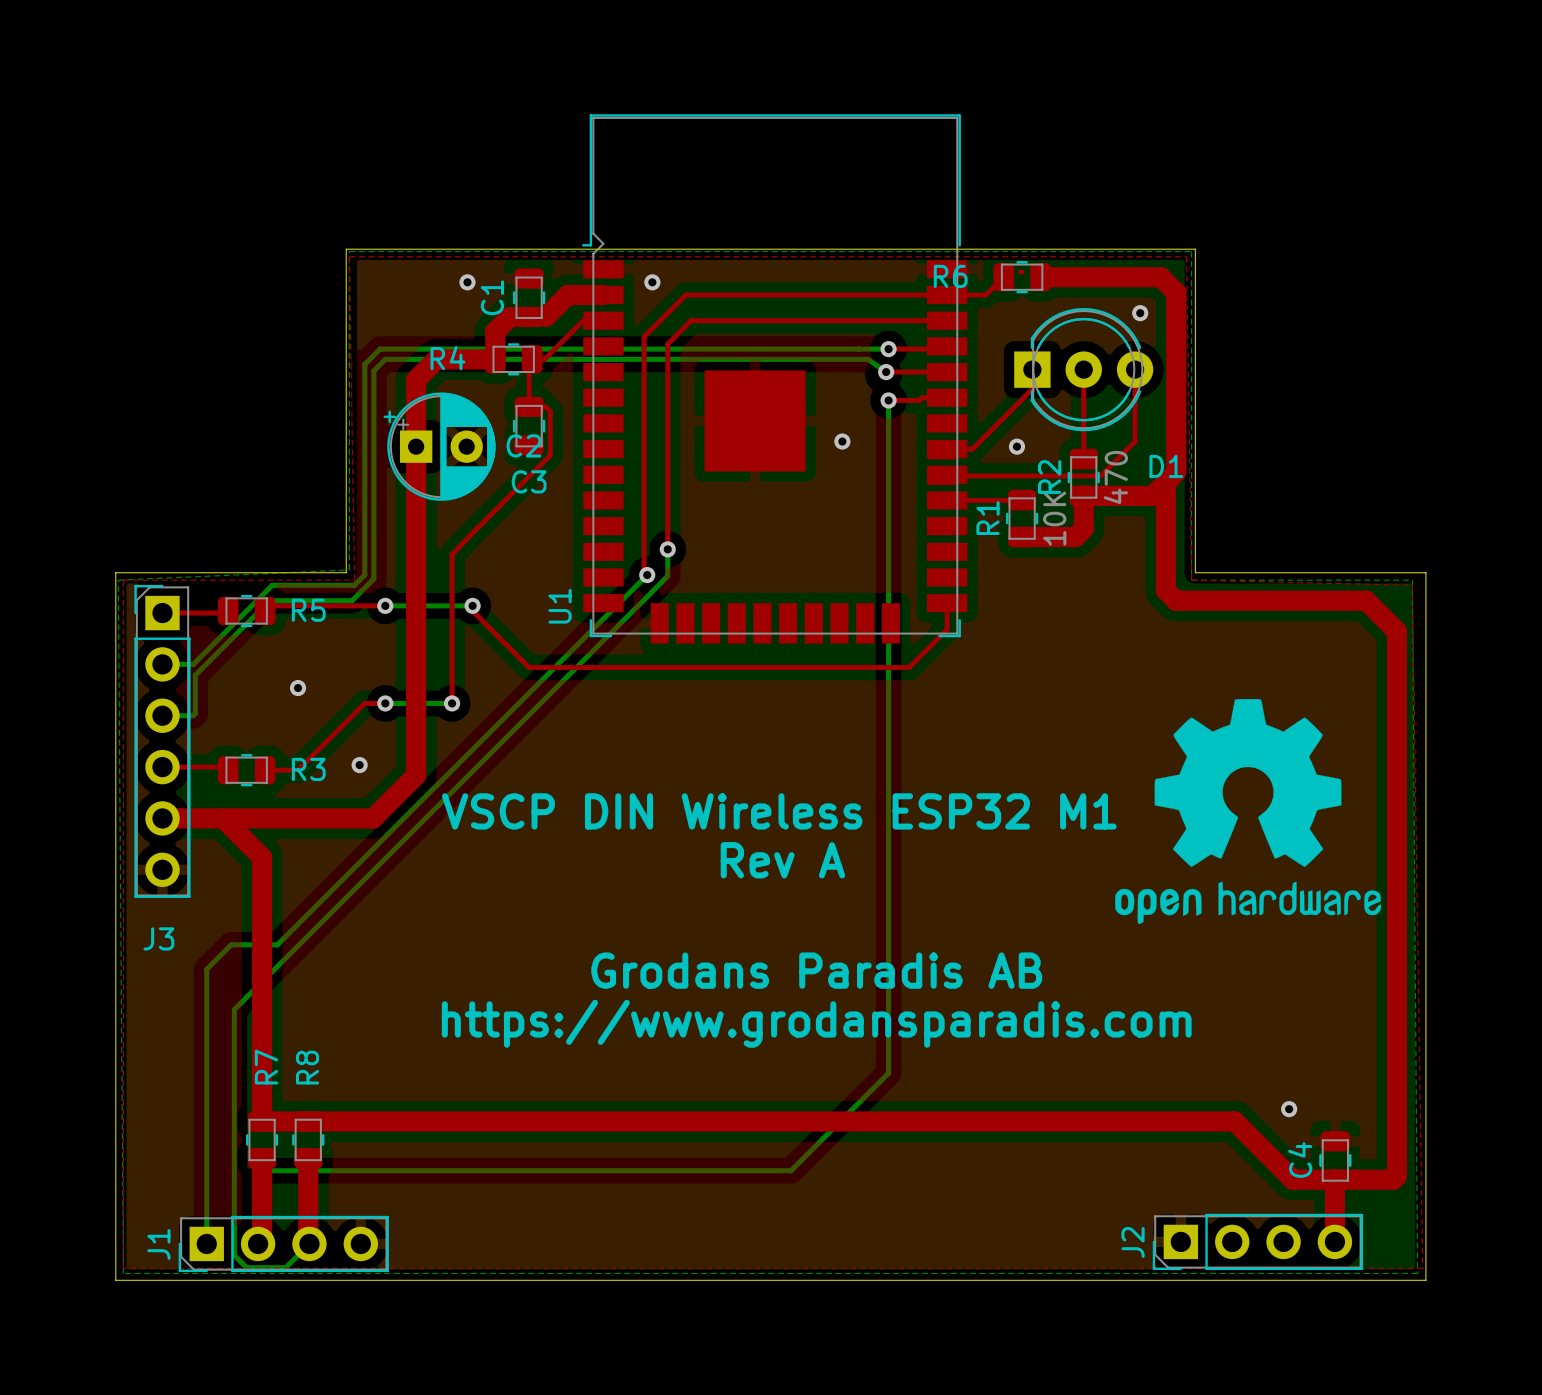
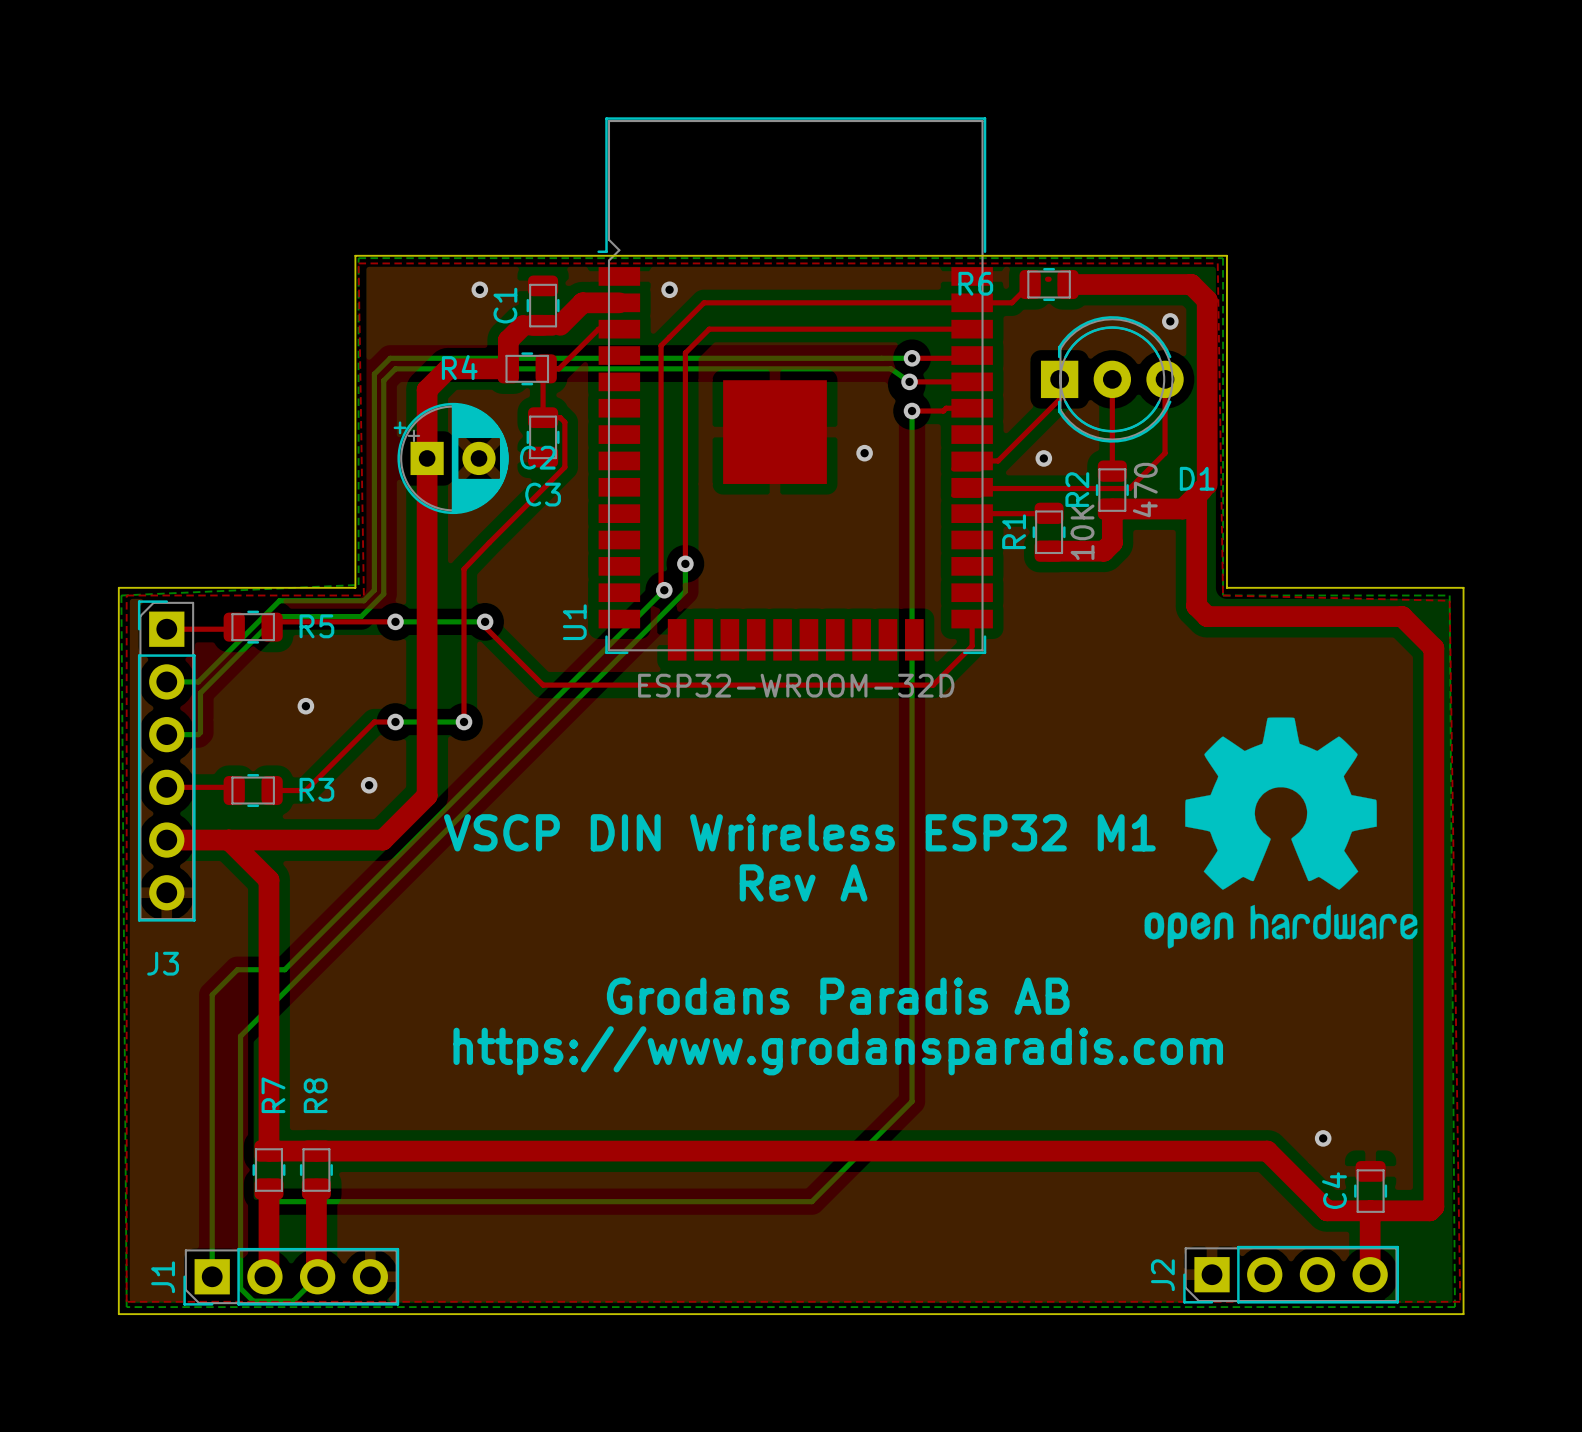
U1 value: none -> ESP32-WROOM-32D (796, 685)
text: VSCP DIN Wireless ESP32 M1 (779, 811) -> VSCP DIN Wrireless ESP32 M1 (799, 832)

